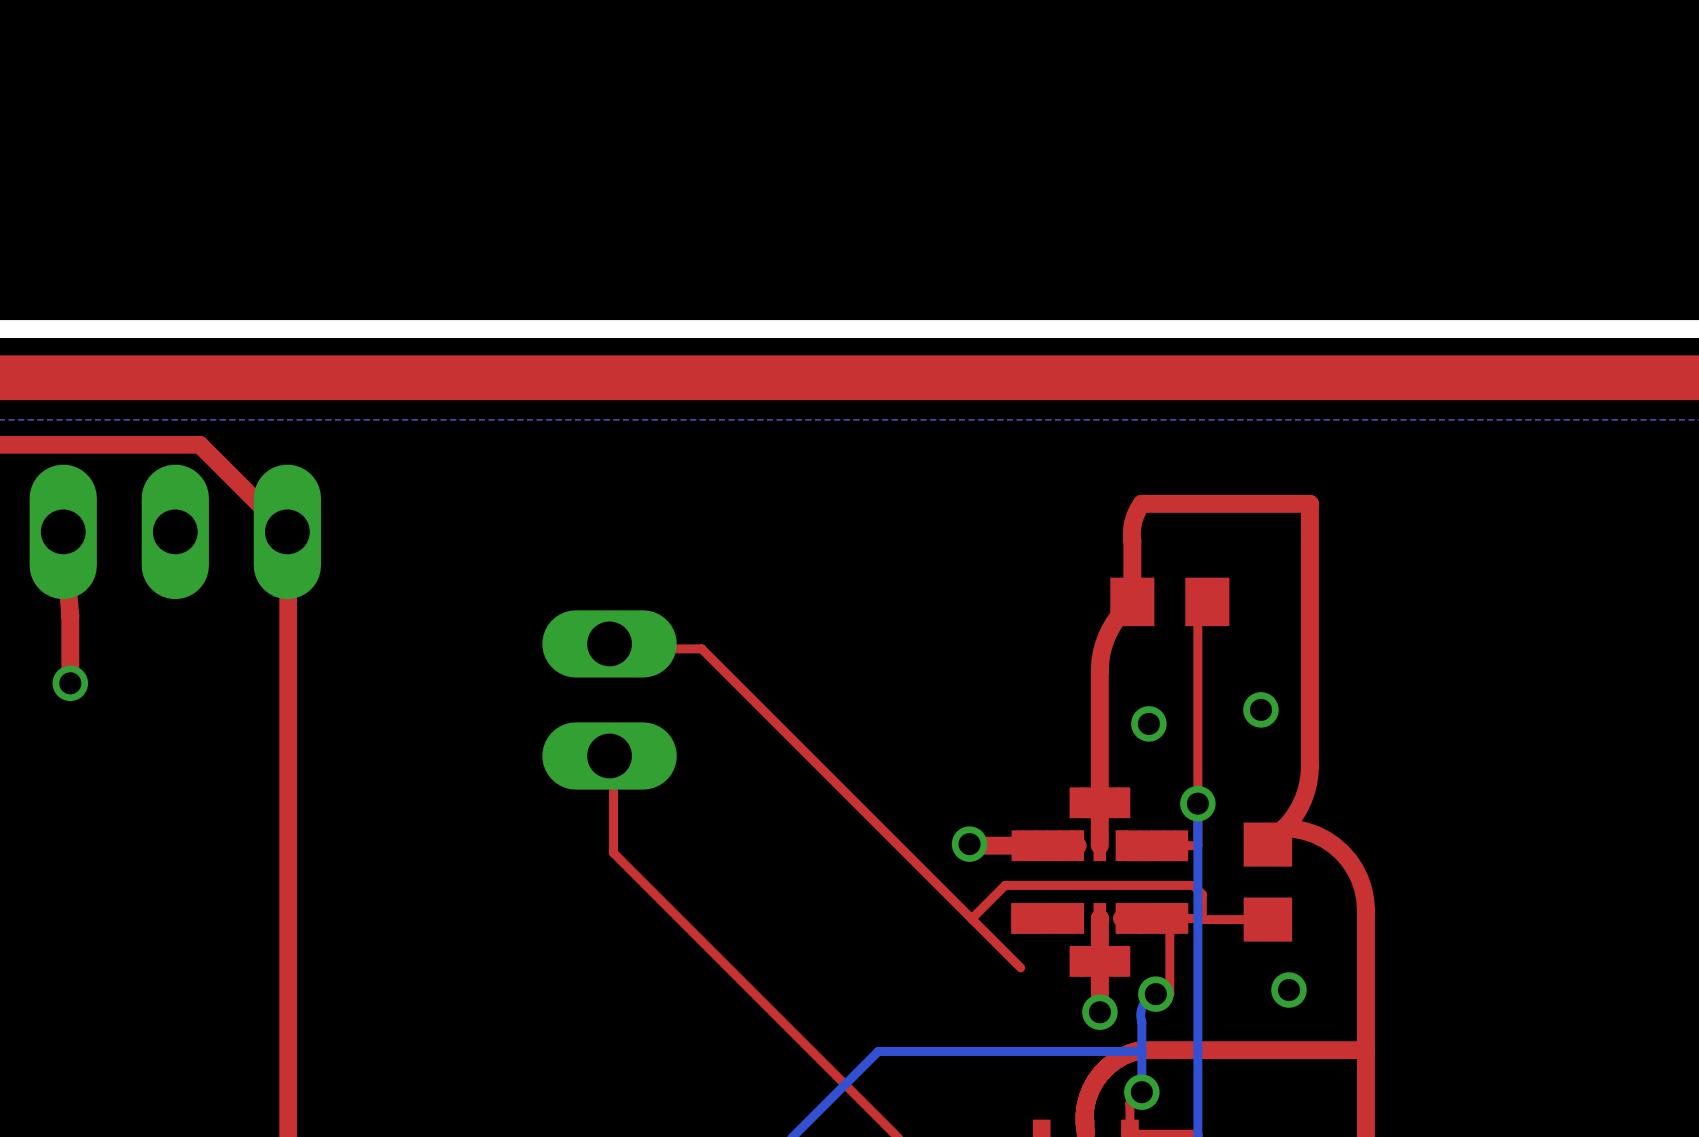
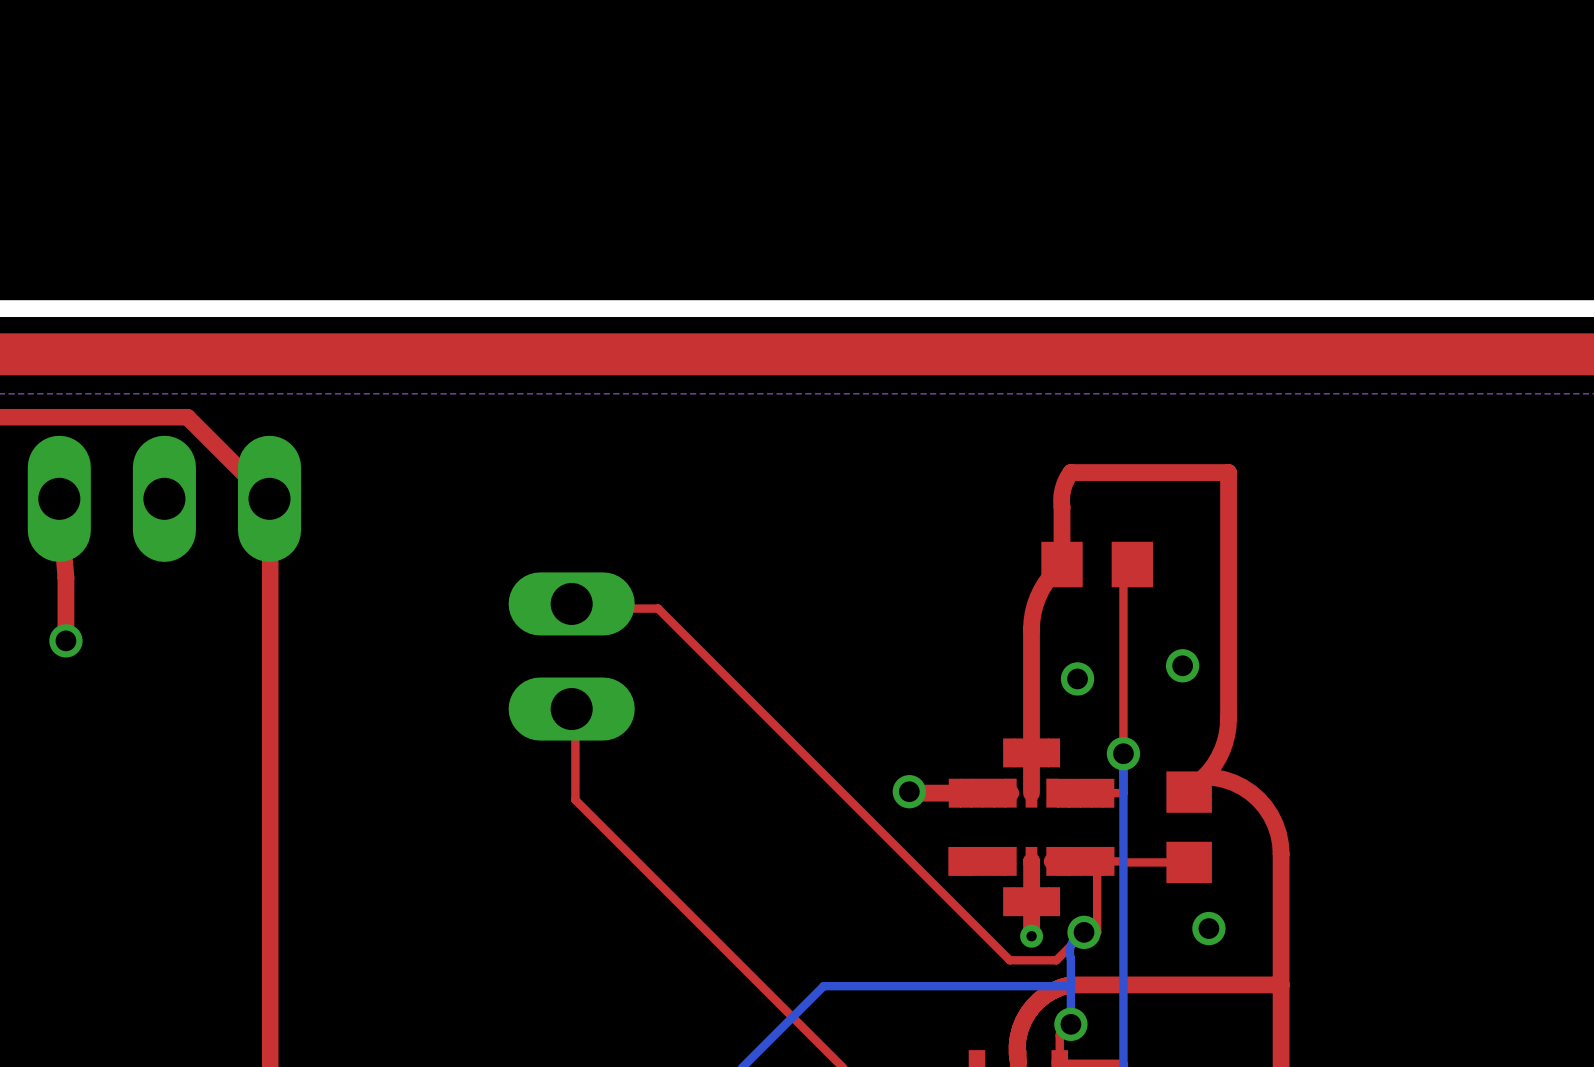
top track: (971, 918) (1005, 885) (1193, 885) (1202, 894) (1202, 919) -> none
top track: none -> (957, 907) (1009, 960) (1056, 960) (1082, 934)
via size: [1082, 994, 1118, 1030] -> [1020, 924, 1044, 948]

